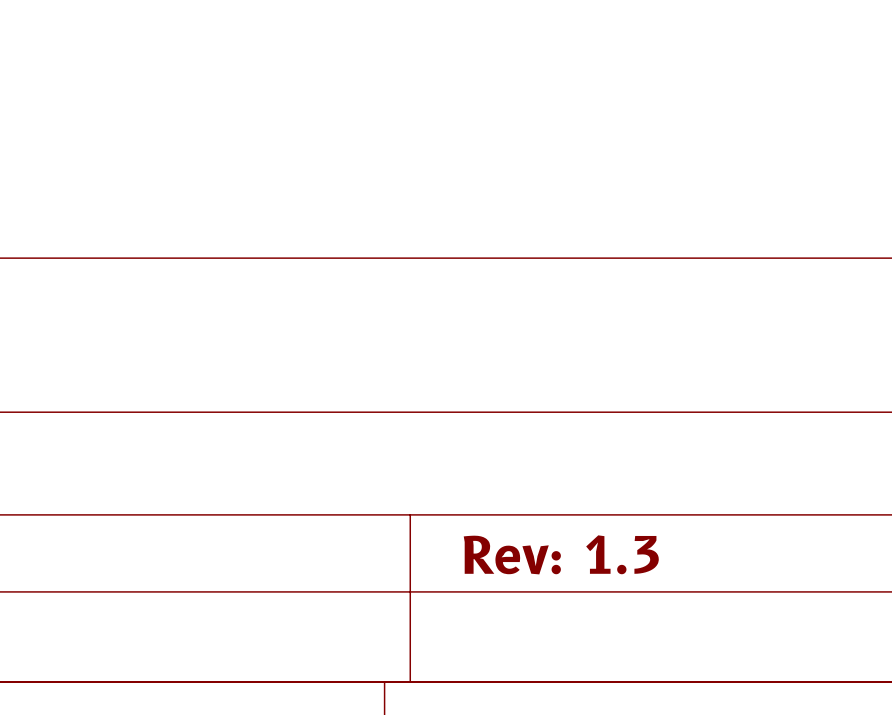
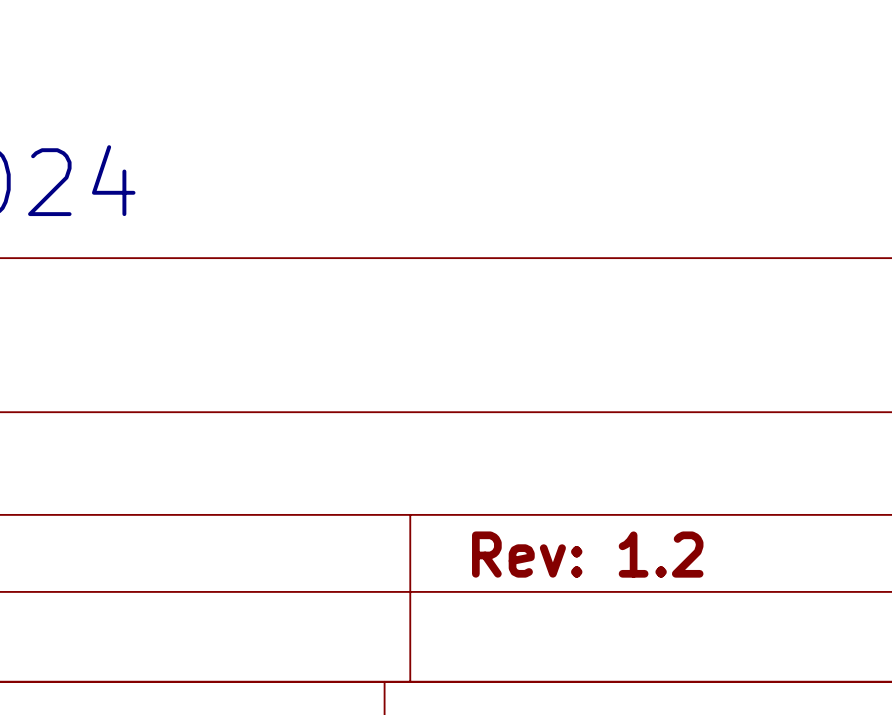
title block: Rev: 1.3 (561, 554) -> Rev: 1.2 (587, 554)

